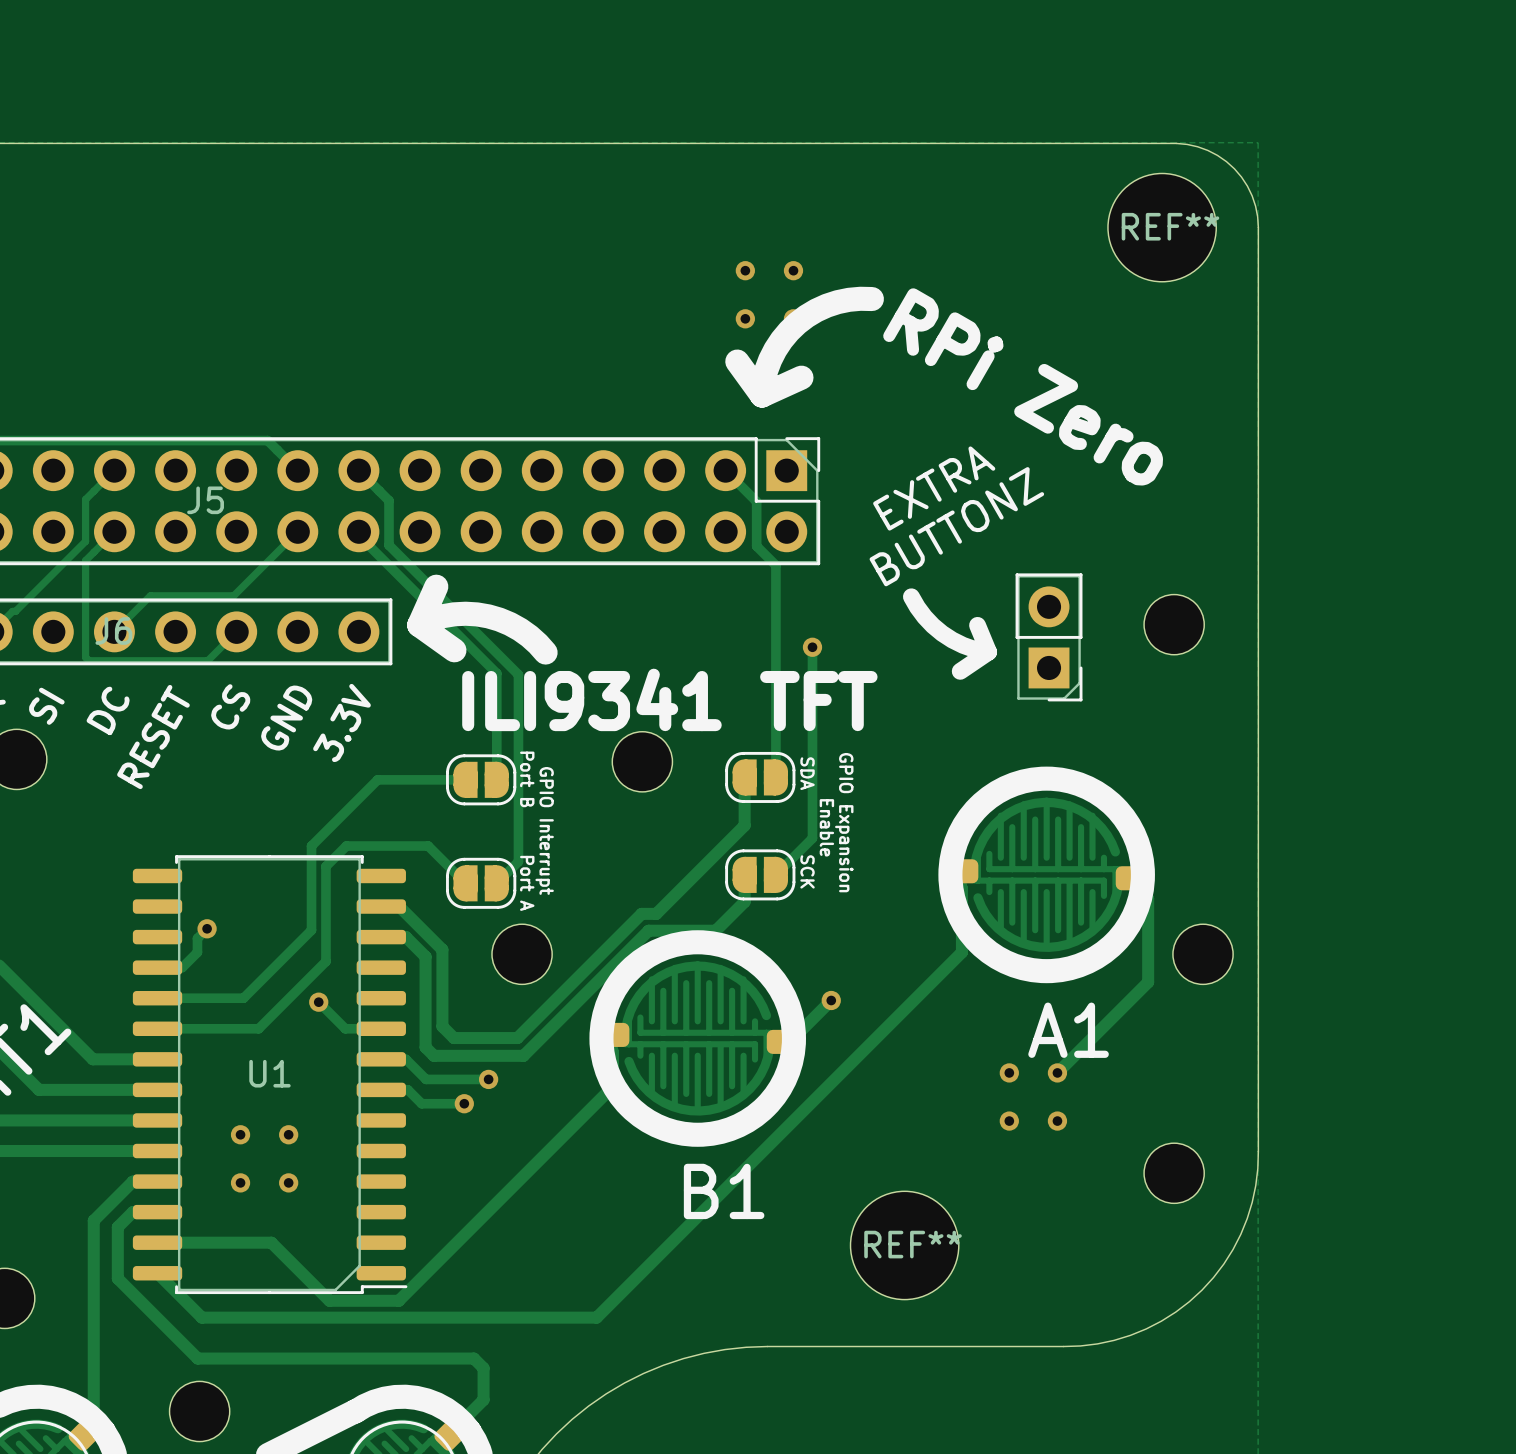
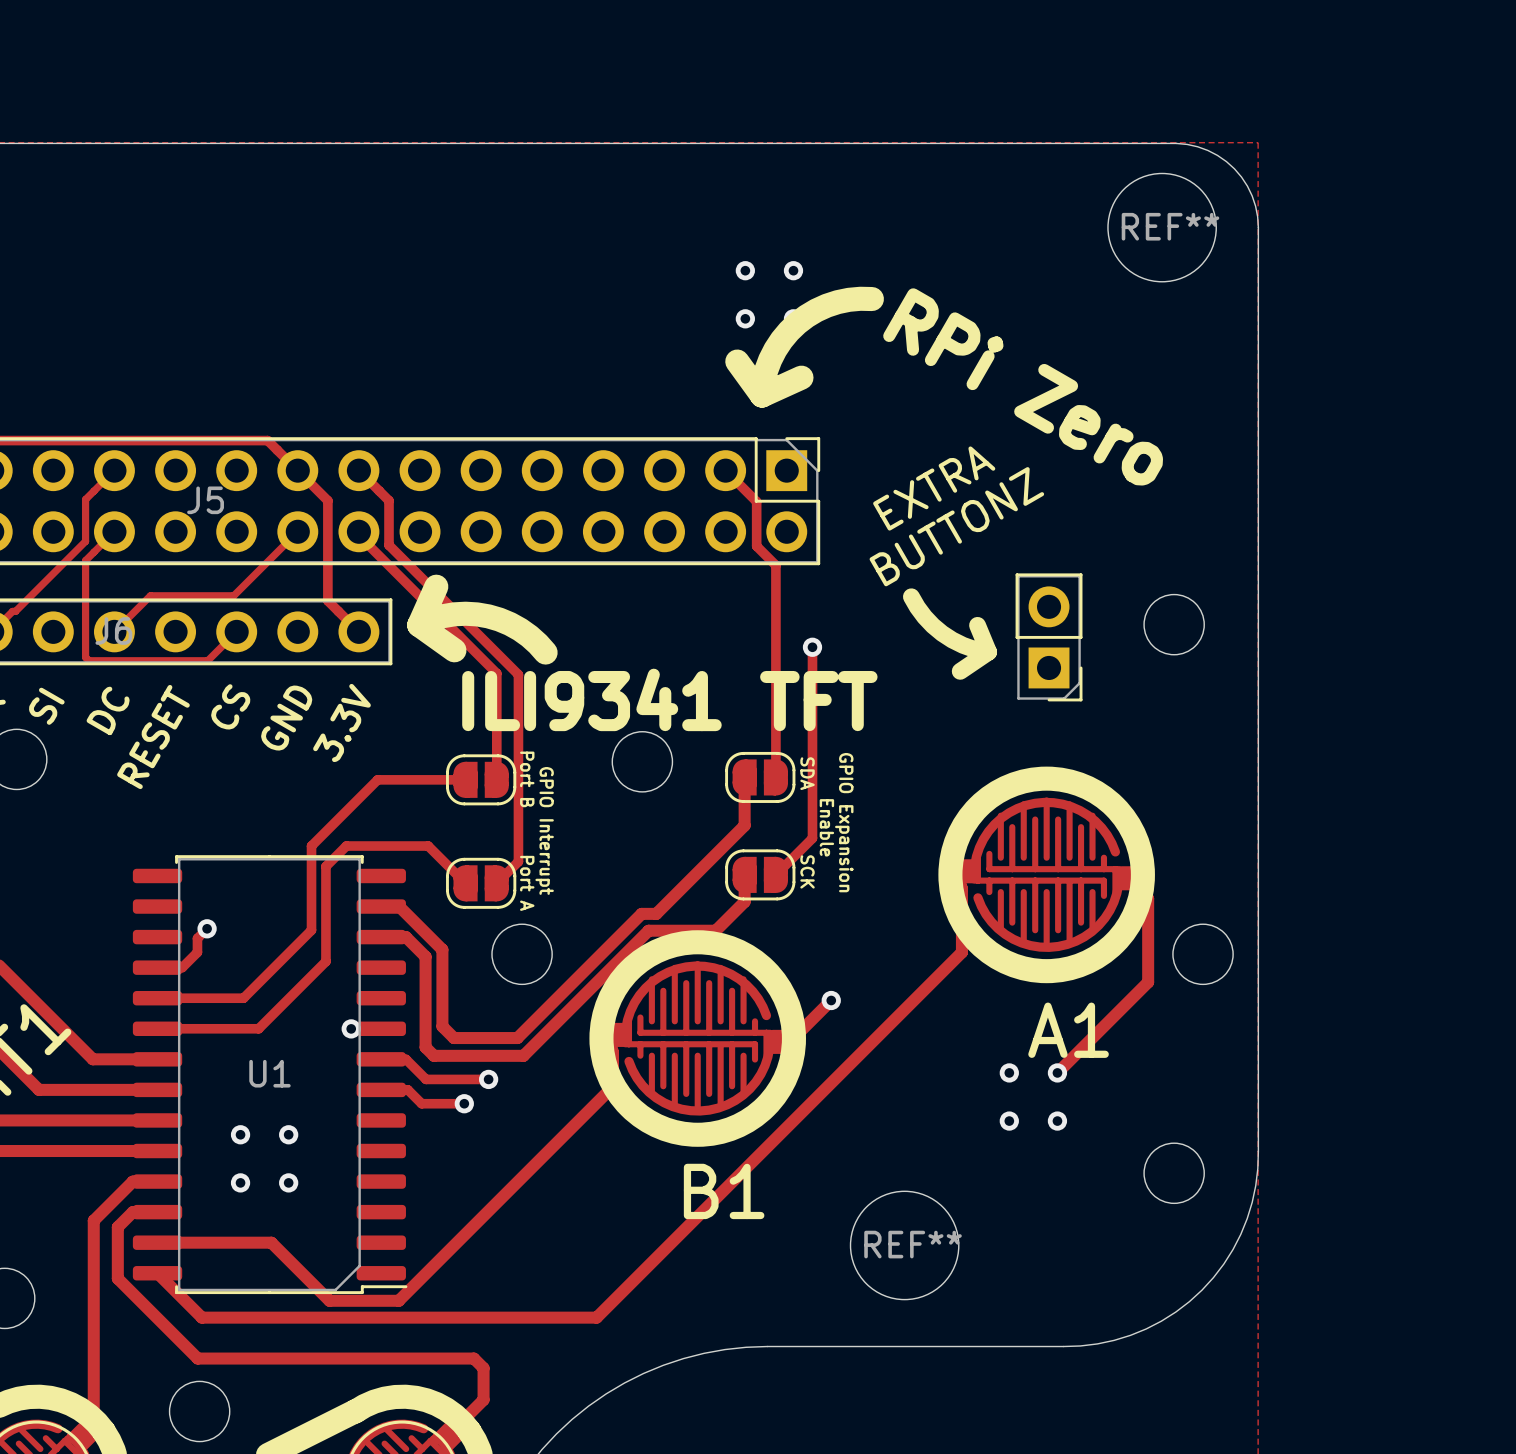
track: none -> (297, 470) (327, 500) (327, 600) (358, 631)
track: (318, 1002) (345, 1028) (351, 1028) -> none
via position: (318, 1002) -> (351, 1028)

